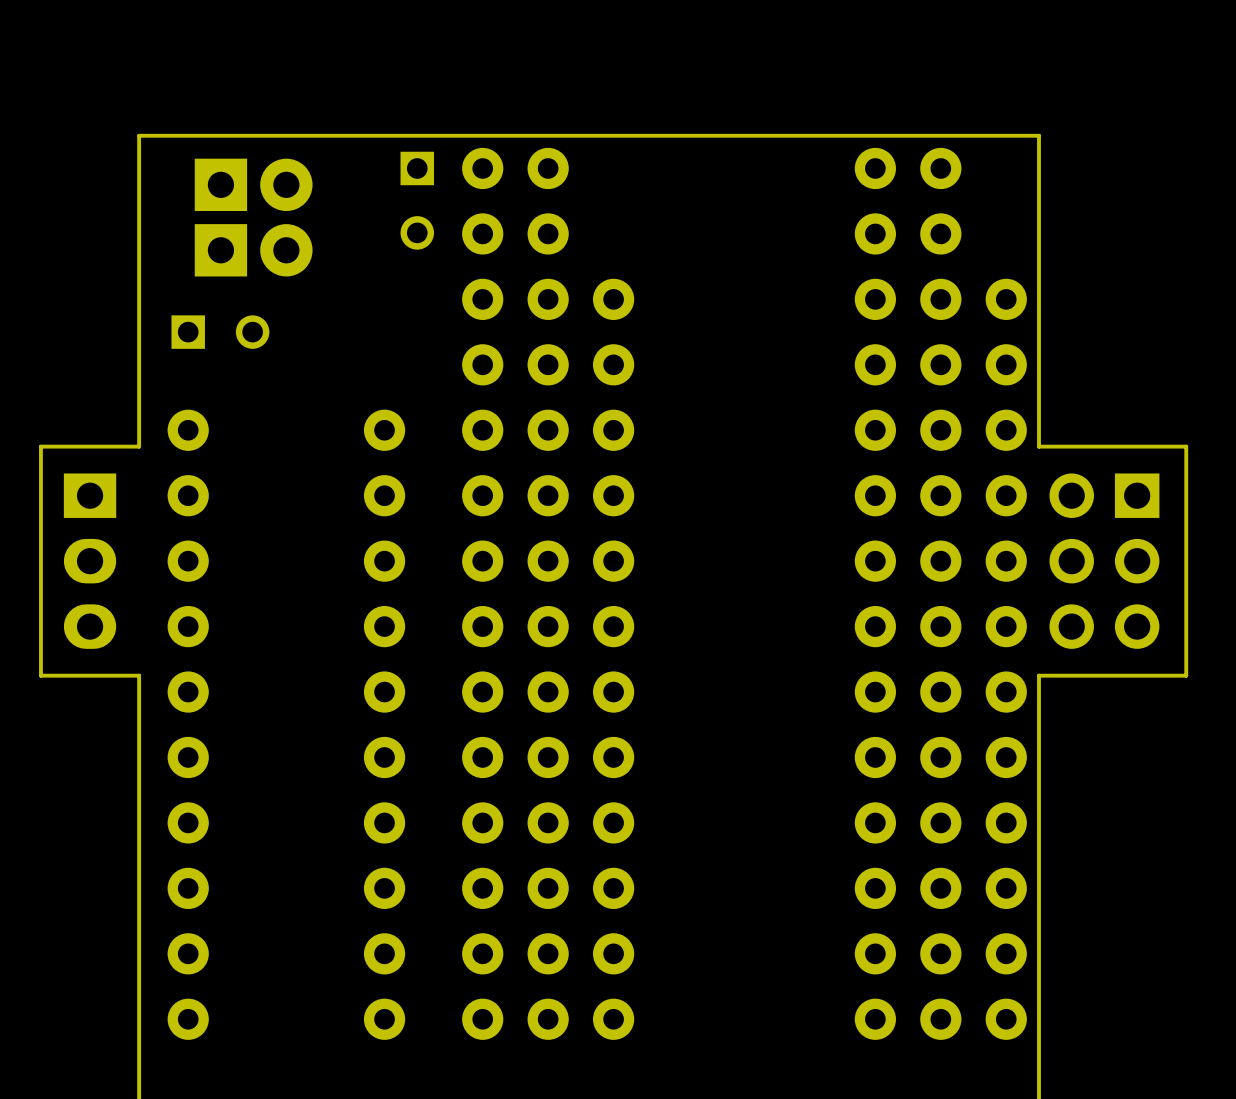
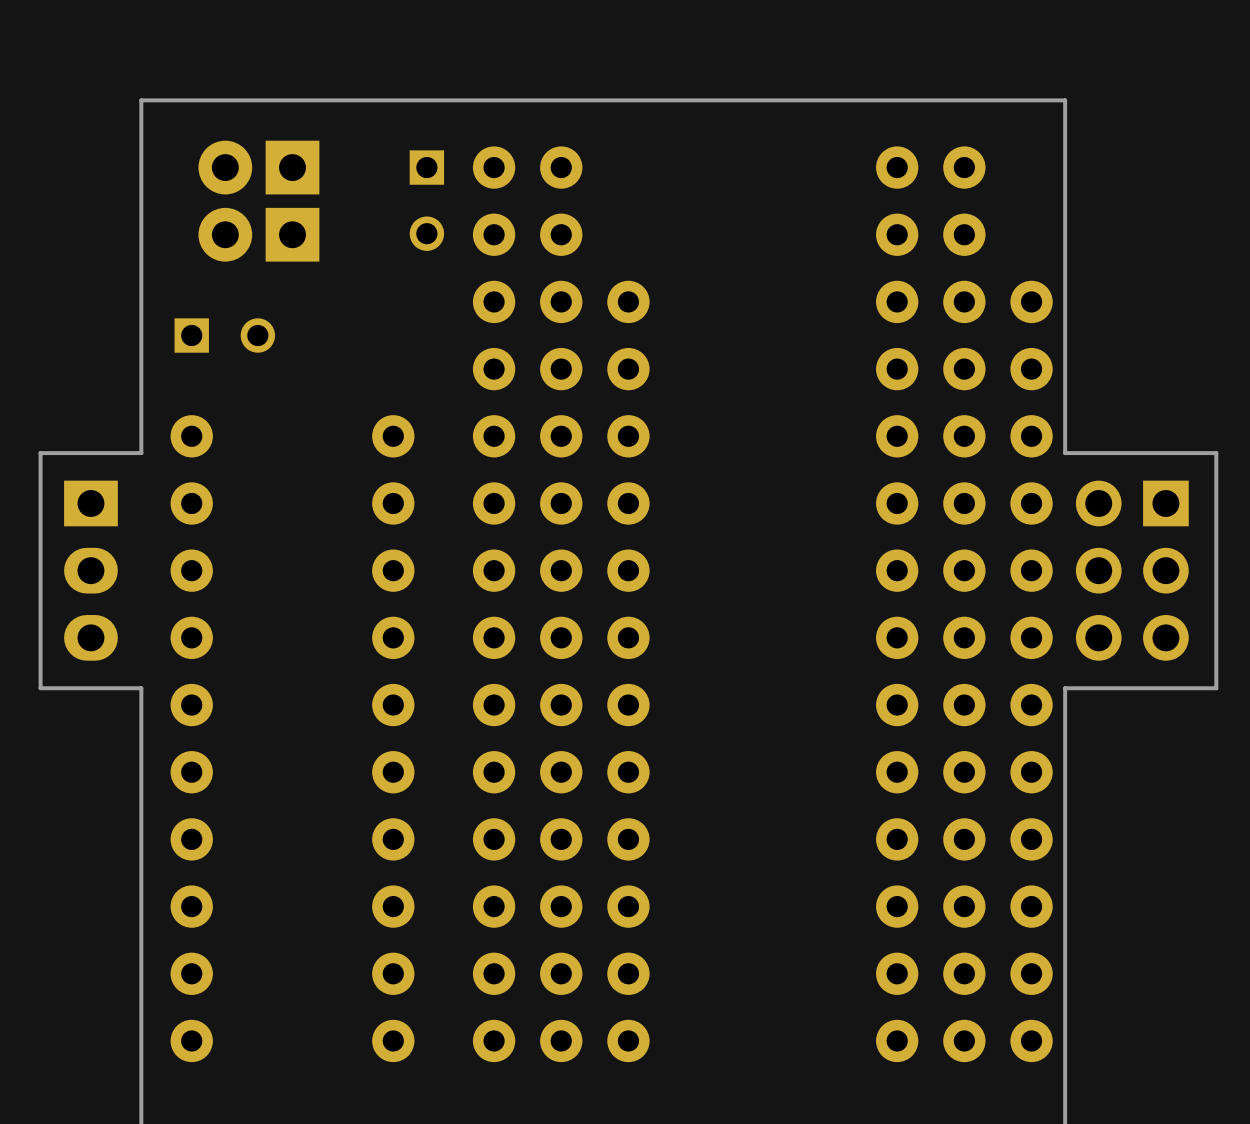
board edge: (1038, 135) (139, 135) -> (1065, 133) (1065, 100) (141, 100) (141, 133)
part rotation: 0° (253, 184) -> 180° (258, 167)
part rotation: 0° (253, 250) -> 180° (258, 234)

